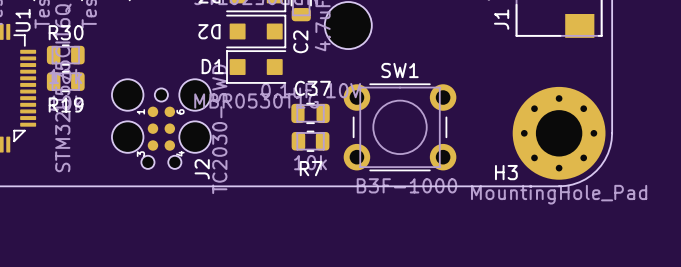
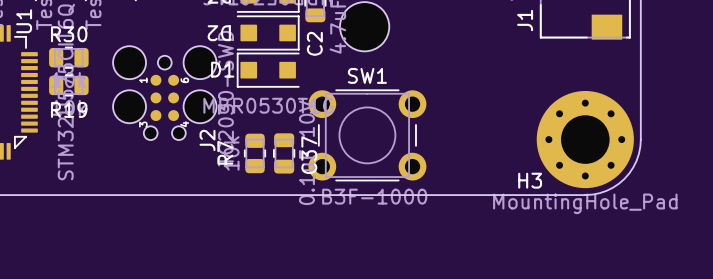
C37 rotation: 0° (310, 113) -> 90° clockwise (284, 153)
C37 position: (310, 113) -> (284, 153)
J2 position: (161, 124) -> (164, 93)
SW1 position: (400, 127) -> (367, 135)
R7 rotation: 0° (310, 141) -> 90° clockwise (255, 153)
R7 position: (310, 141) -> (255, 153)

